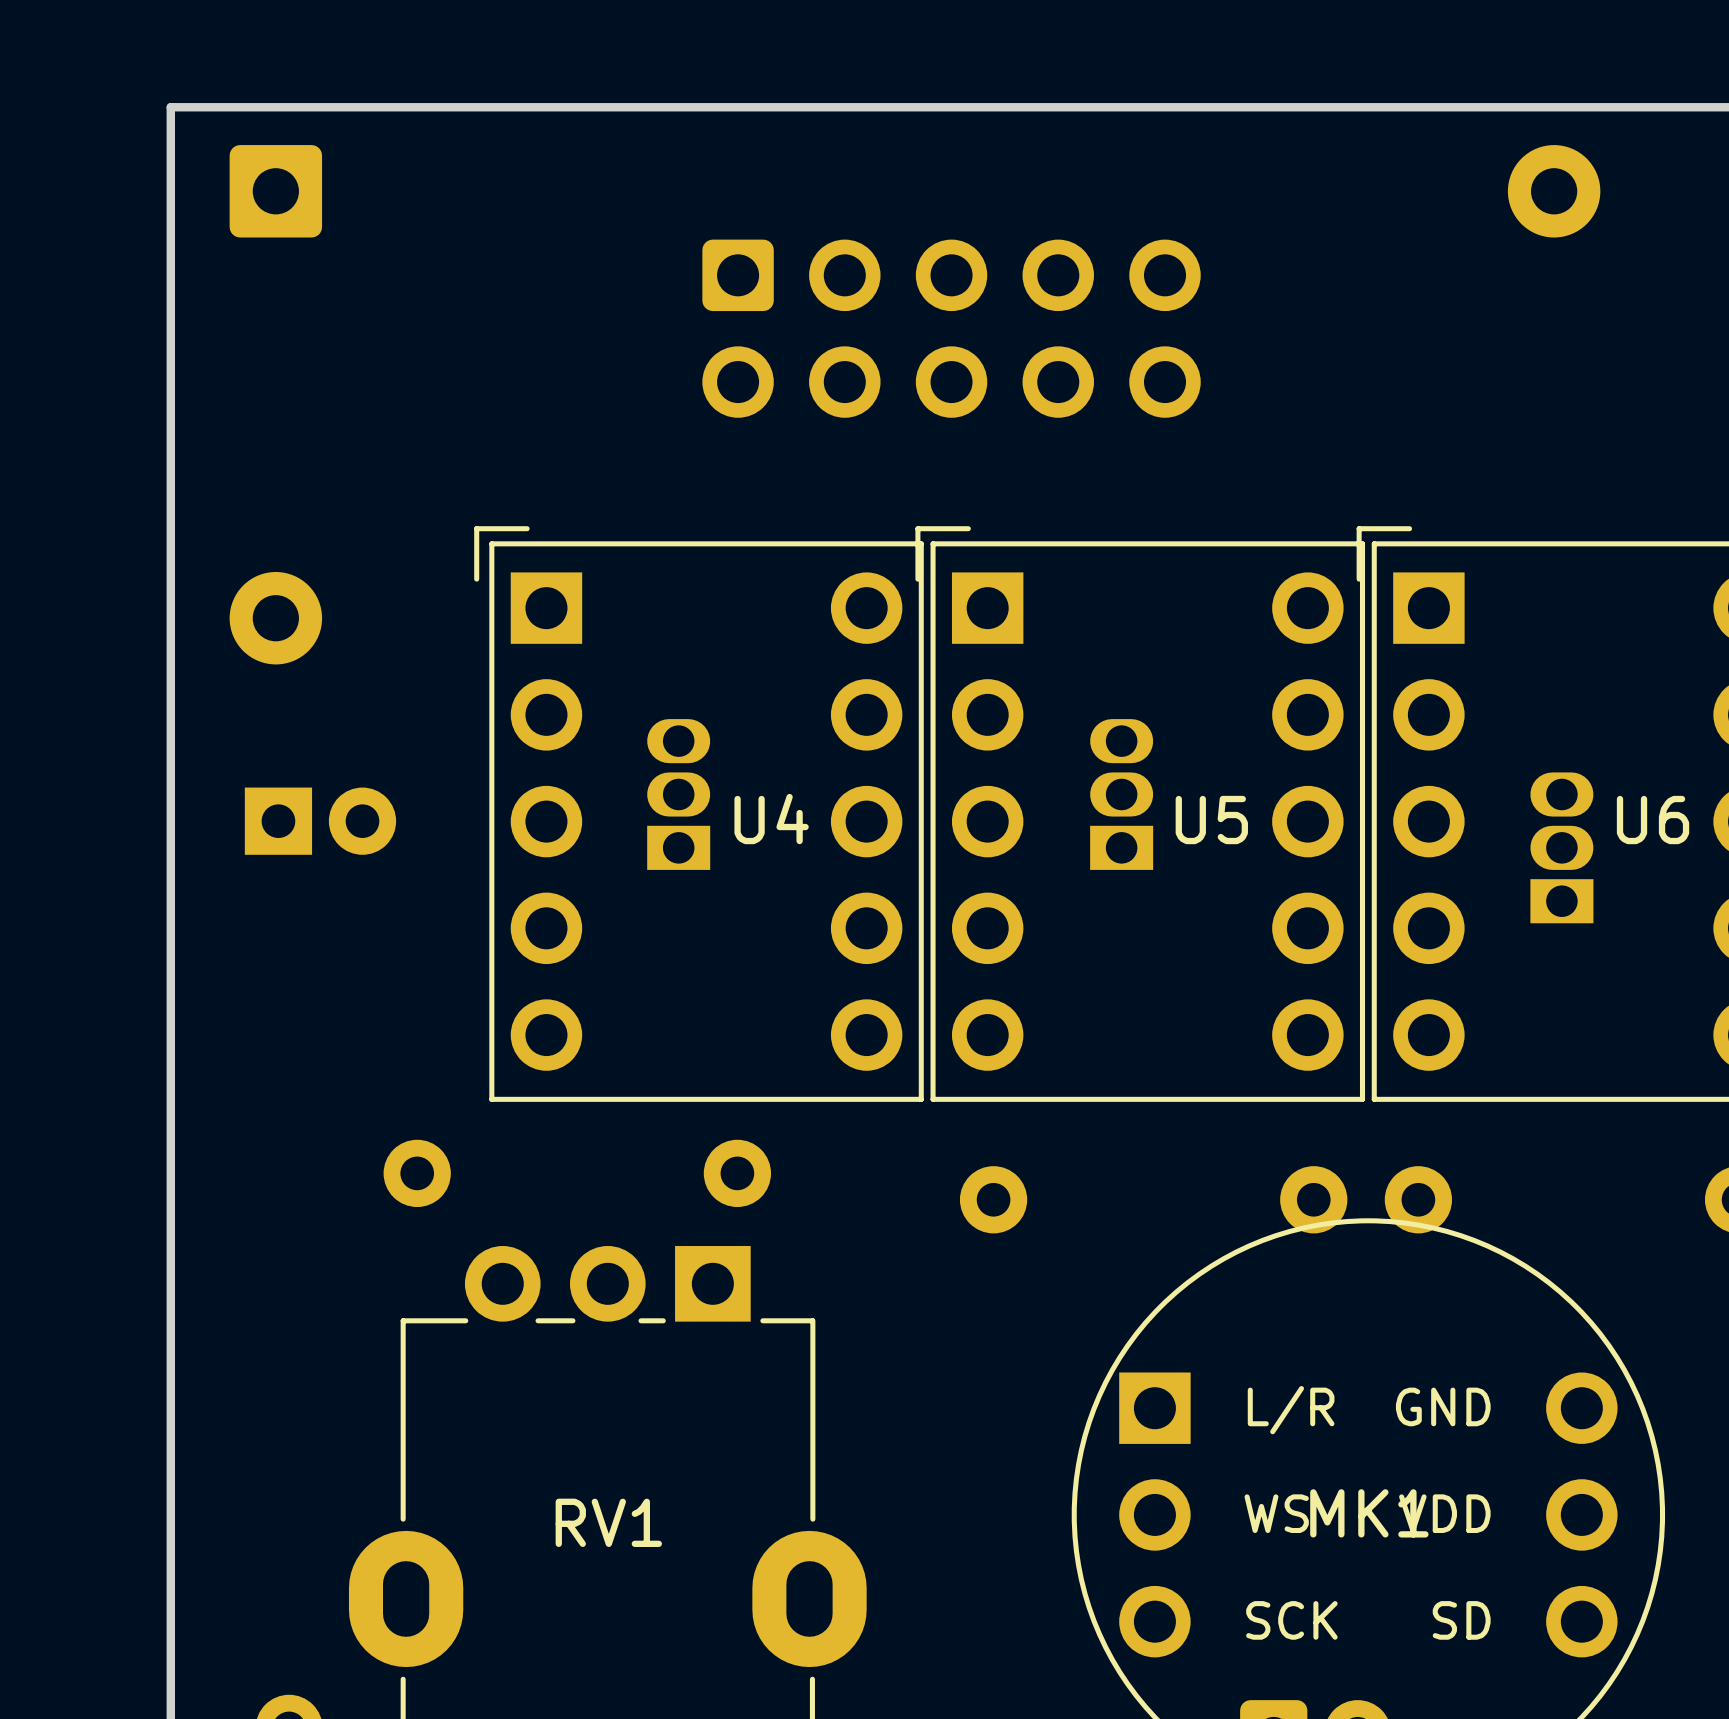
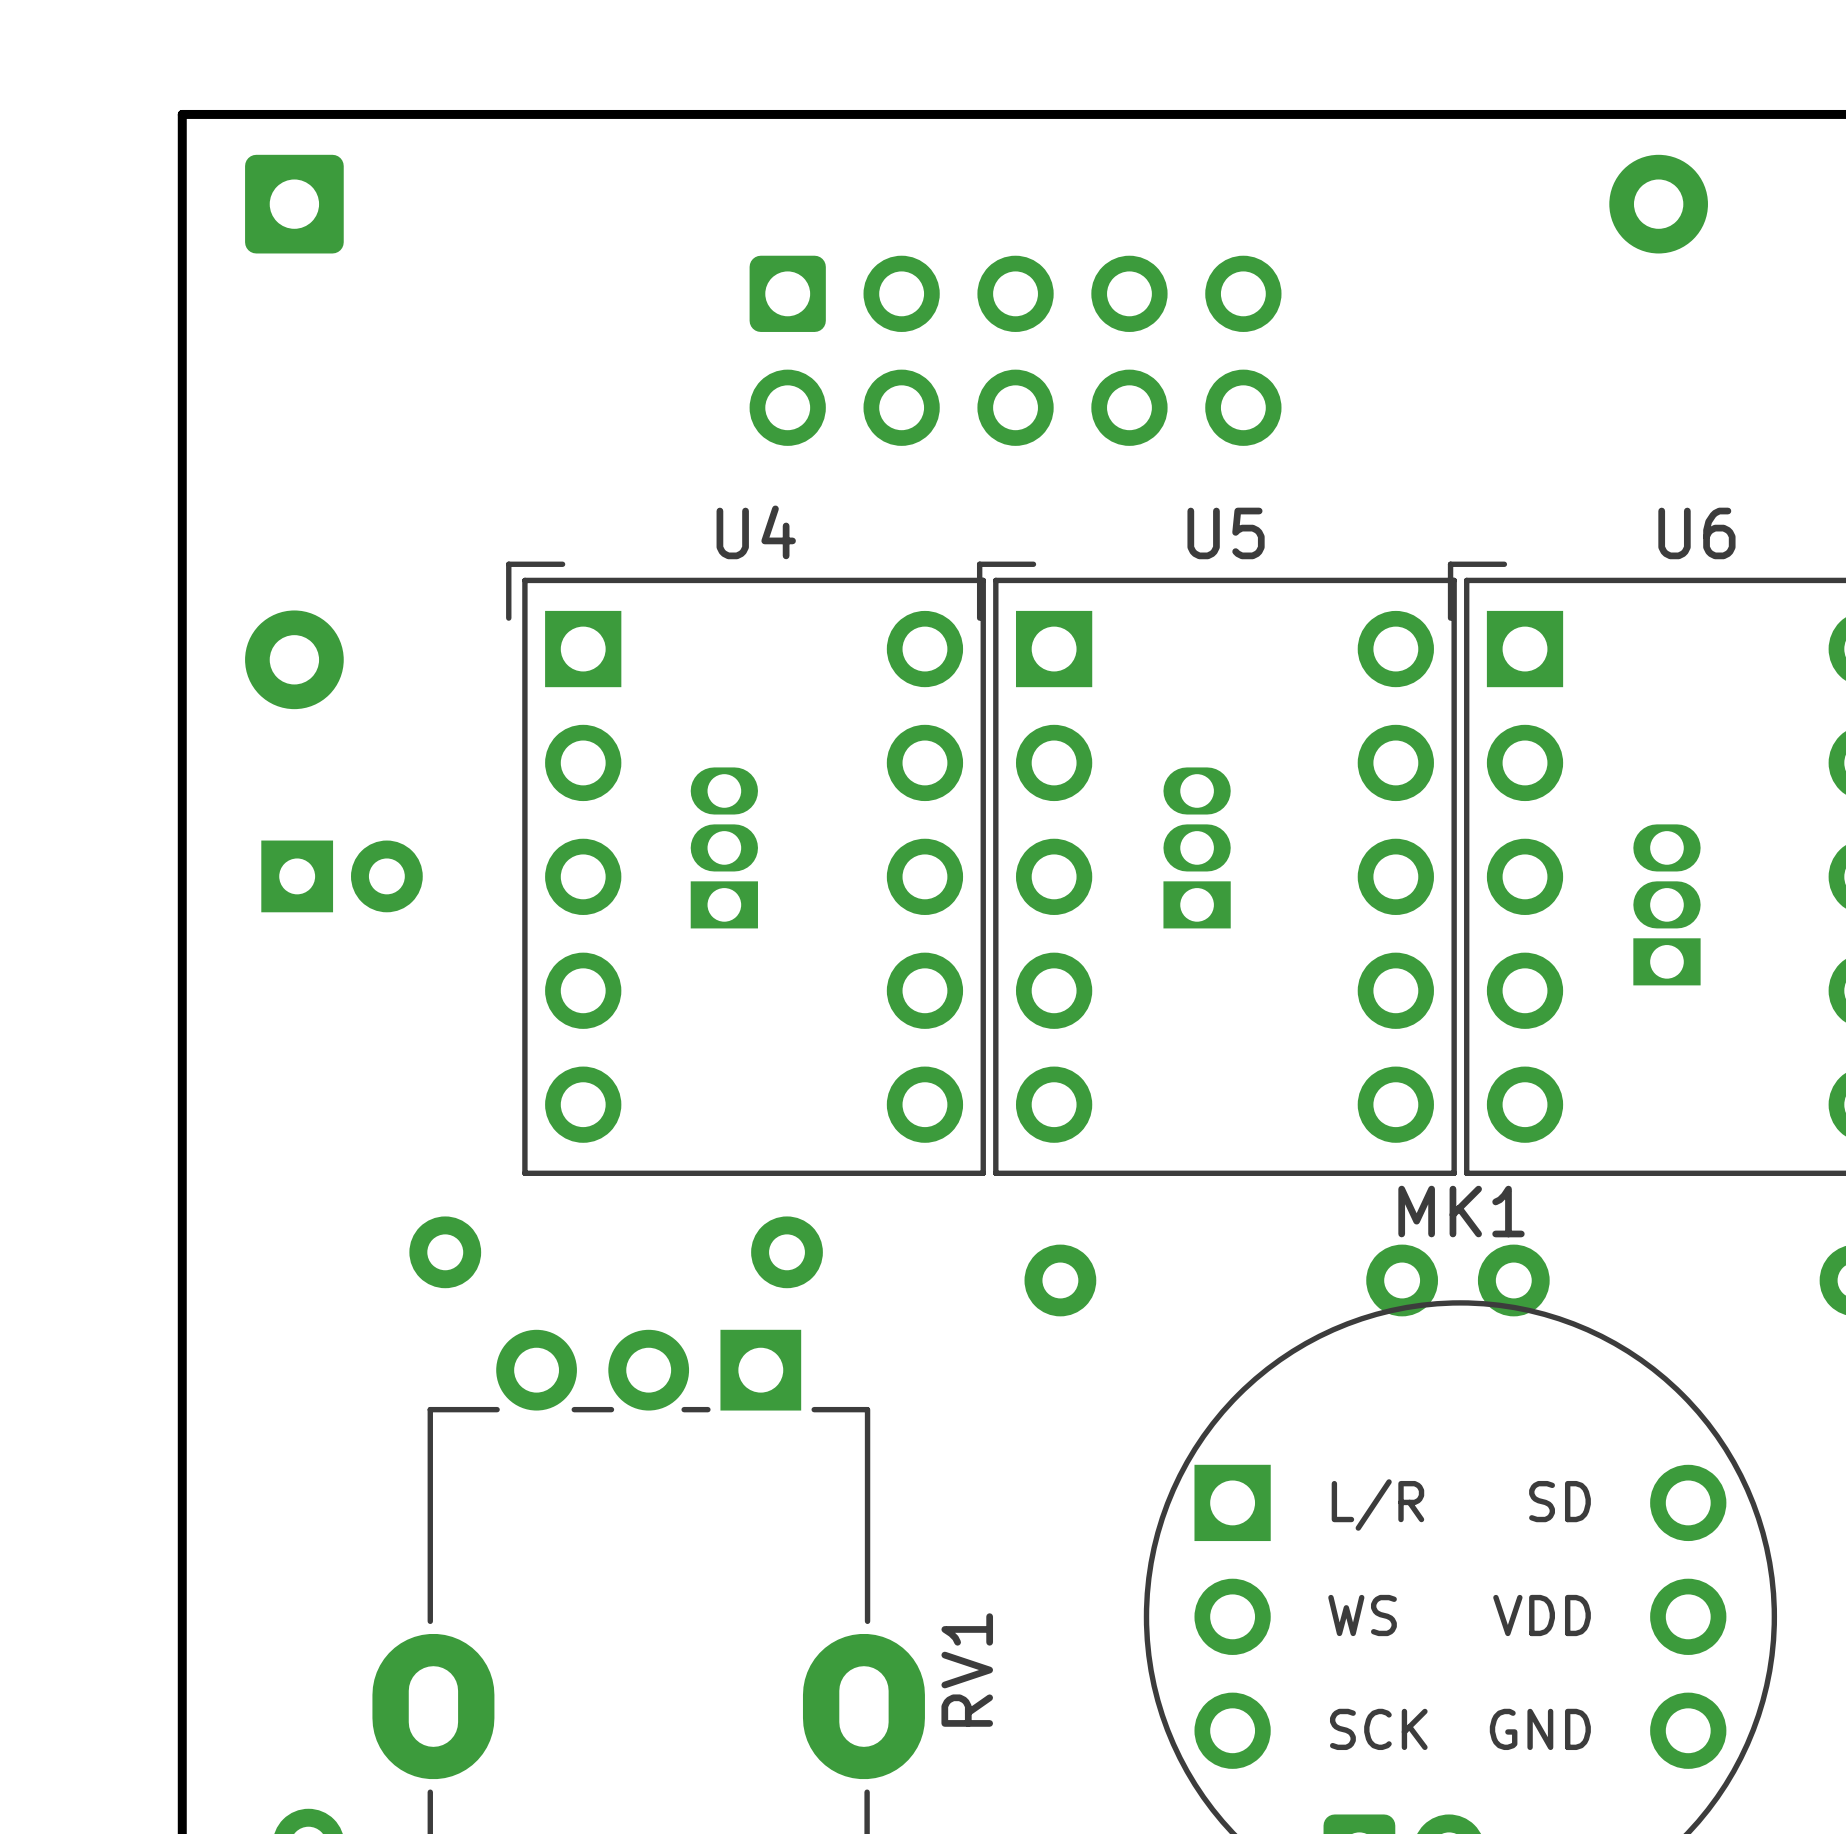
U4 name position: U4 (771, 819) -> U4 (756, 532)
U5 name position: U5 (1211, 820) -> U5 (1226, 533)
U6 name position: U6 (1653, 820) -> U6 (1696, 533)
MK1 text: GND (1443, 1406) -> SD (1559, 1501)
MK1 name position: MK1 (1369, 1513) -> MK1 (1461, 1211)
RV1 name rotation: 0° (608, 1522) -> 90° counterclockwise (967, 1670)
RV1 name position: RV1 (608, 1522) -> RV1 (967, 1670)
MK1 text: SD (1461, 1620) -> GND (1540, 1729)

